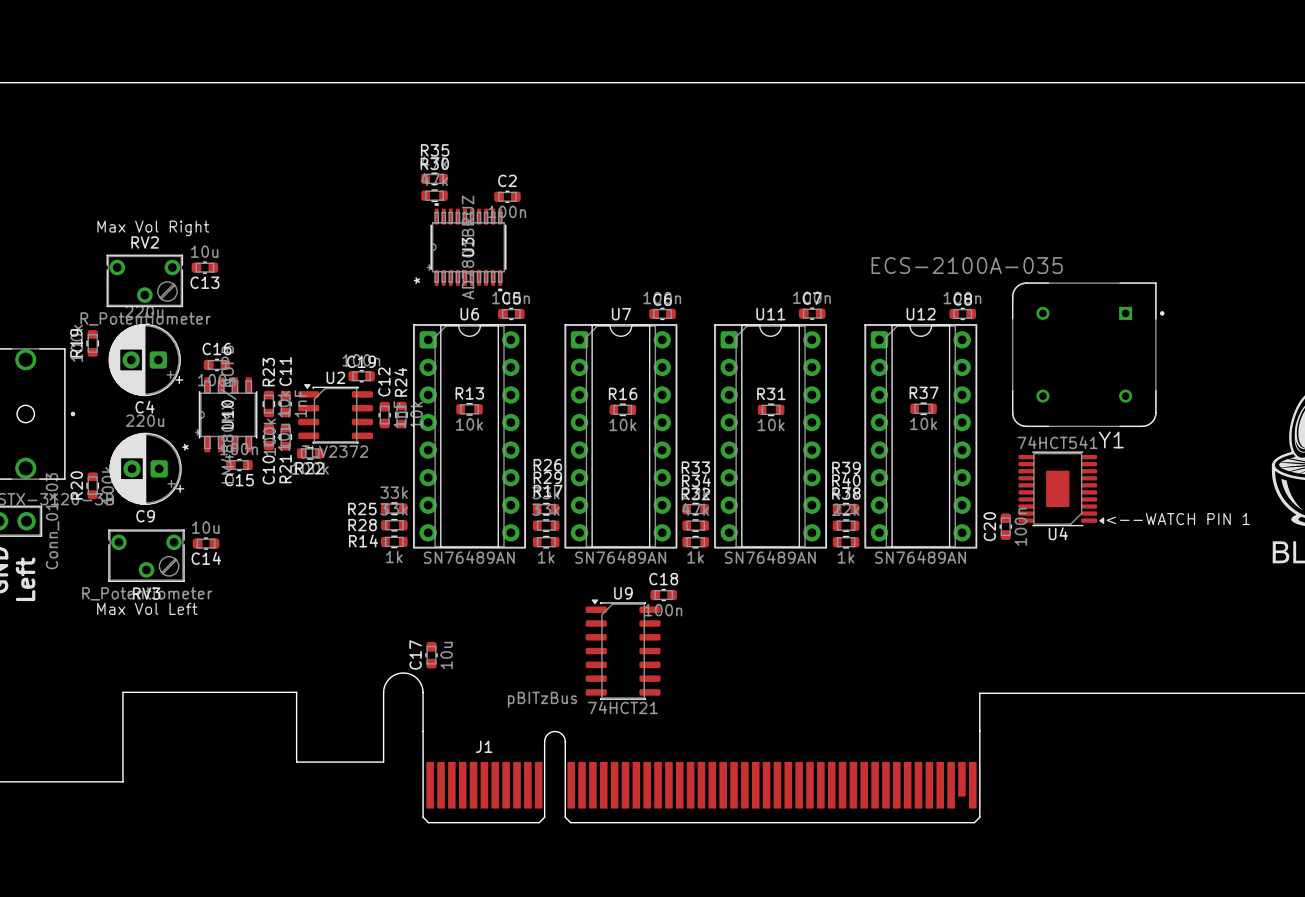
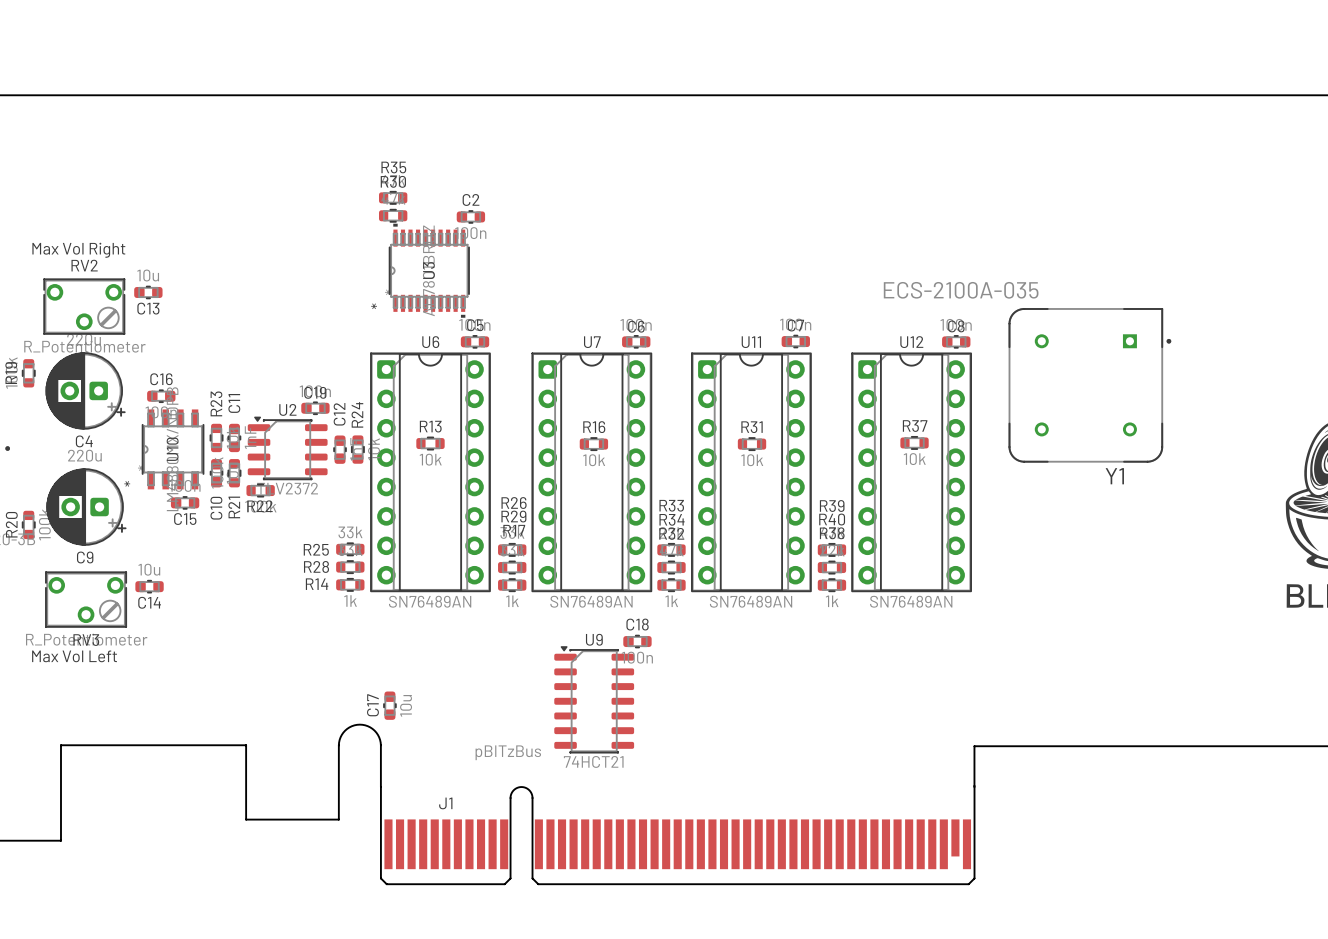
U4: 74HCT541 (1061, 488) -> none
text: <--WATCH PIN 1 (1178, 519) -> none
C20: 100n (1005, 526) -> none

